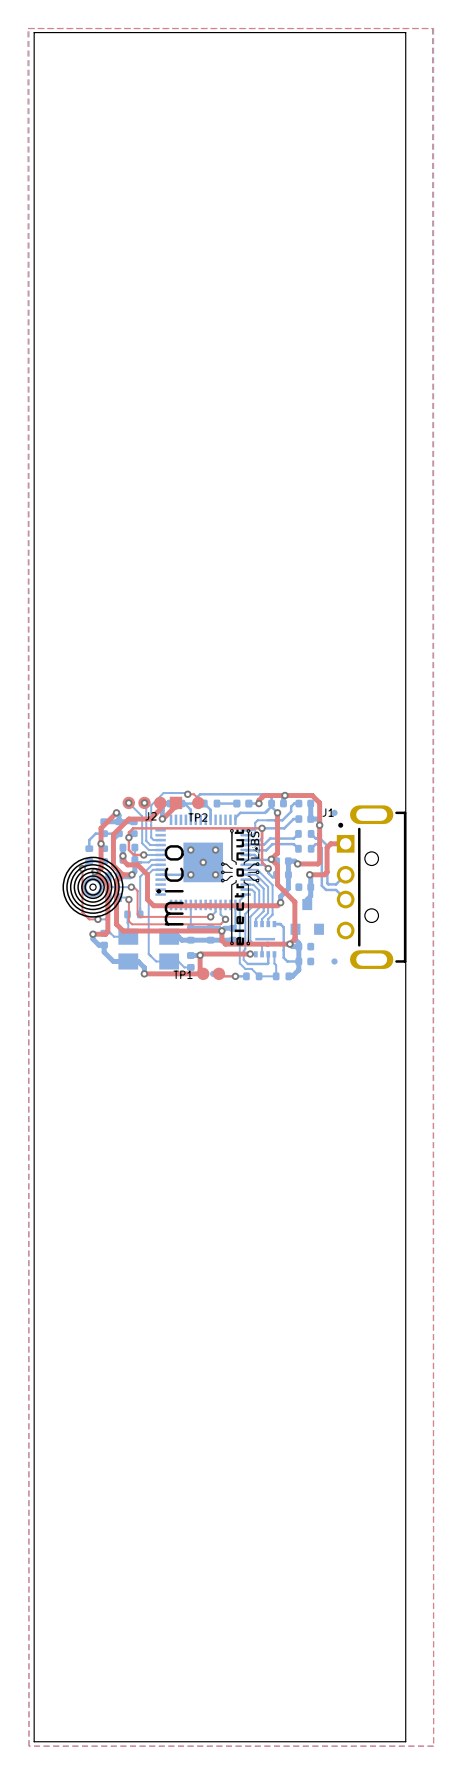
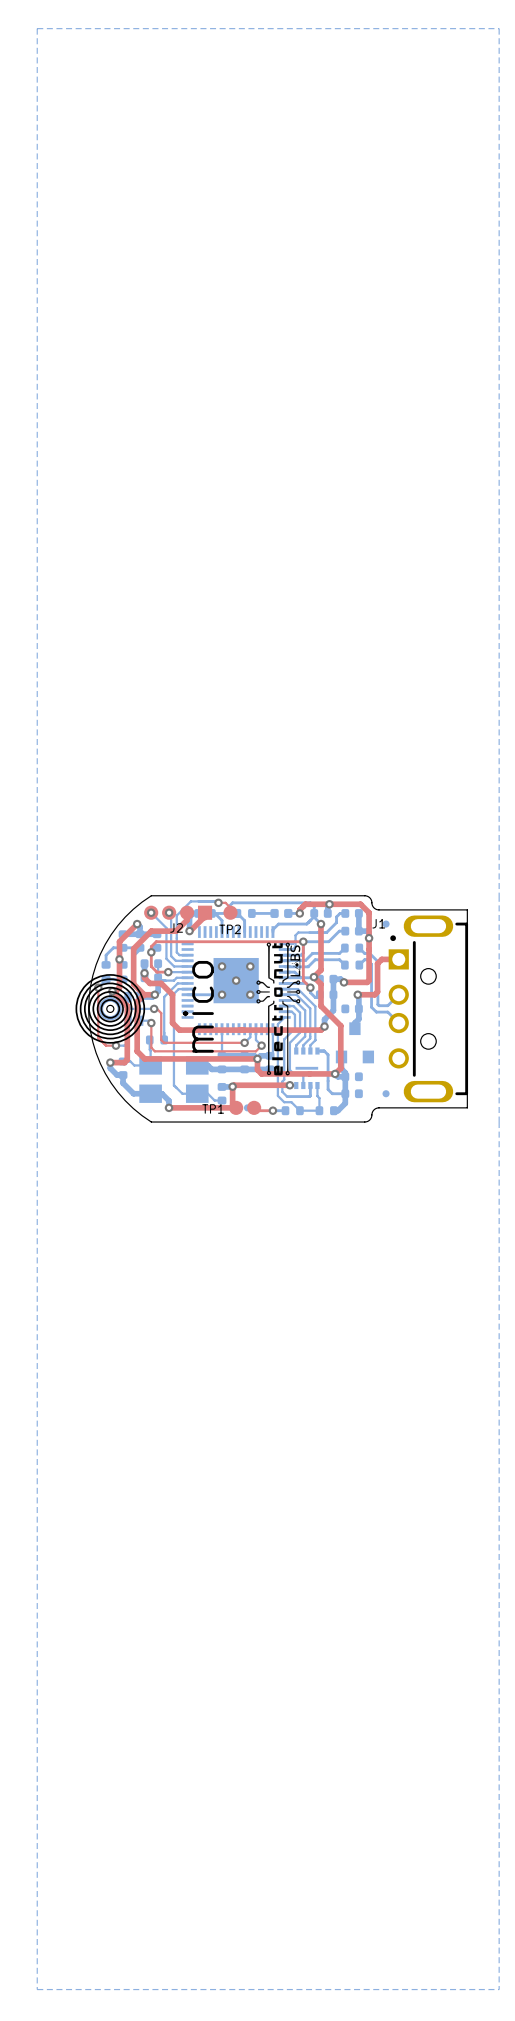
top zone outline: (28, 28) (28, 1746) (433, 1746) (432, 28) (28, 28) -> none
board edge: (405, 800) (405, 32) (34, 32) (34, 1741) (405, 1741) (405, 973) -> (467, 909) (378, 909) (373, 907) (369, 897) (364, 895) (151, 895) (125, 917) (105, 944) (92, 975) (88, 1008) (92, 1042) (105, 1073) (125, 1100) (151, 1122) (364, 1122) (369, 1119) (373, 1110) (378, 1107) (467, 1107)

